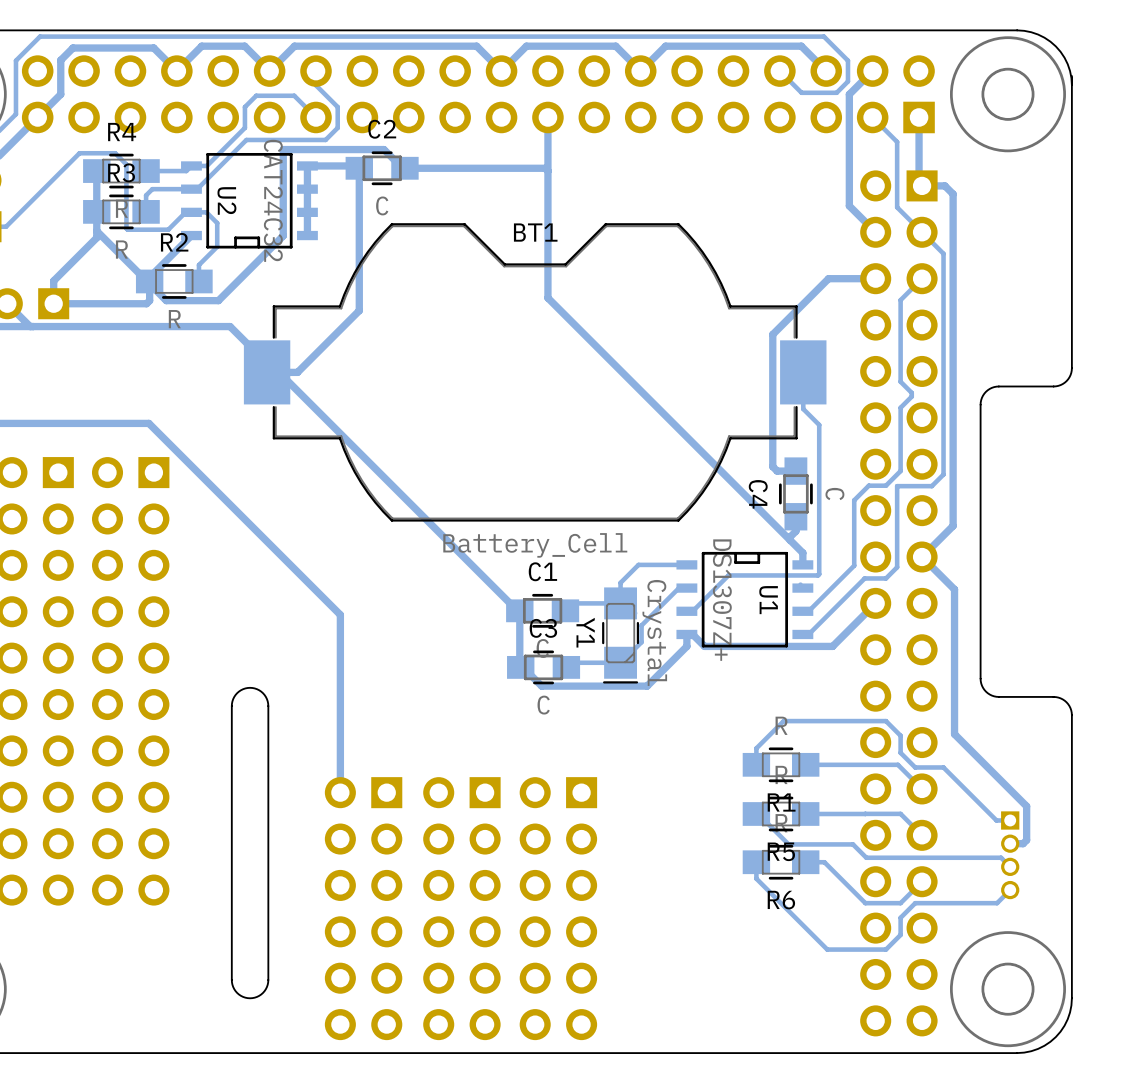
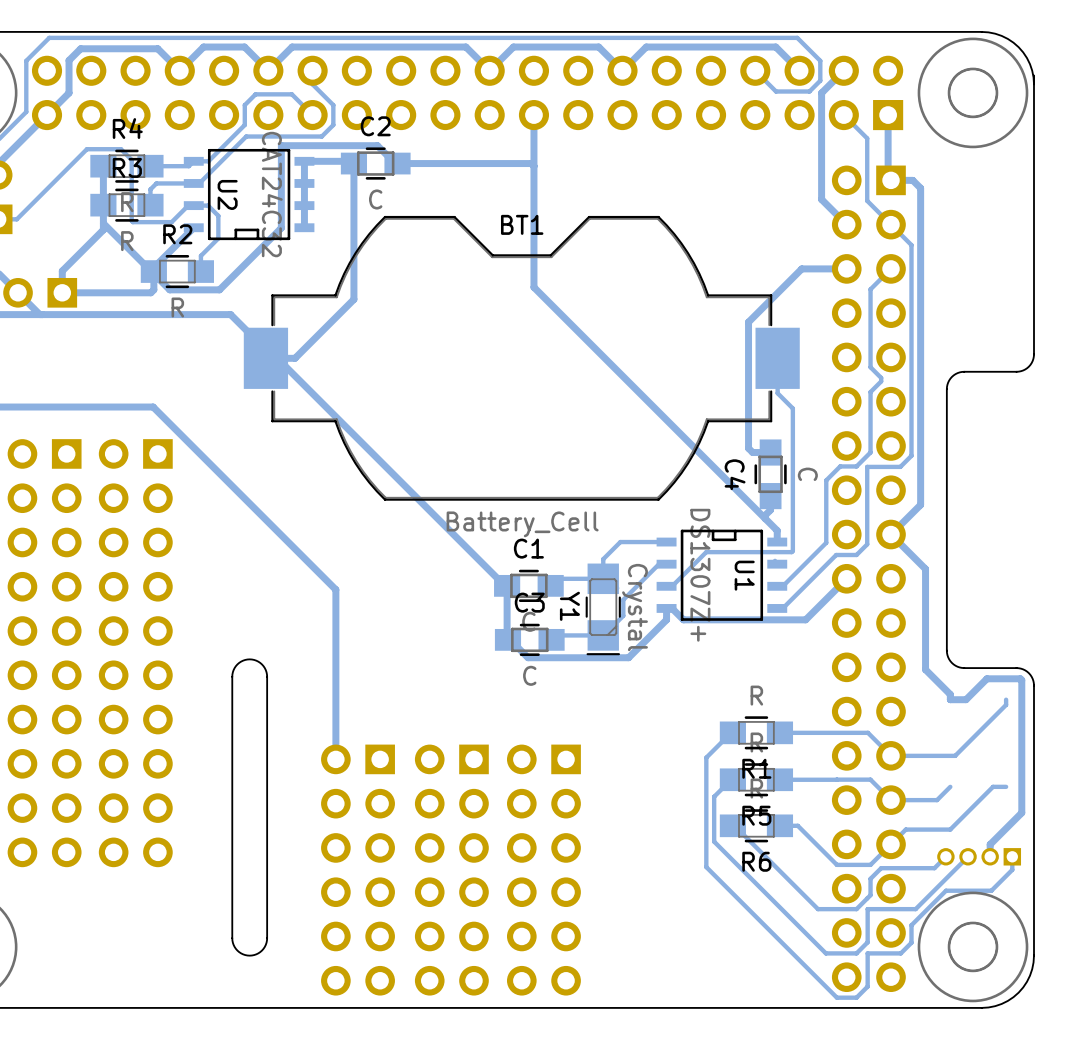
track: (954, 589) (954, 734) (1026, 806) (1026, 840) (1023, 843) (1010, 843) -> (922, 565) (925, 569) (925, 669) (950, 694) (950, 699) (966, 699) (986, 678) (1021, 680) (1021, 812) (990, 844) (990, 856)
track: none -> (1006, 699) (1006, 704) (955, 755) (891, 755)
track: (756, 764) (756, 748) (783, 721) (885, 721) (900, 735) (900, 752) (915, 767) (943, 767) (996, 820) (1010, 820) -> (732, 732) (706, 757) (706, 867) (836, 997) (856, 997) (867, 986) (867, 953) (900, 953) (911, 942) (911, 925) (946, 890) (991, 890) (1012, 869) (1012, 856)
track: none -> (732, 779) (714, 796) (714, 841) (825, 953) (856, 953) (867, 942) (867, 909) (915, 909) (968, 856)
track: (758, 813) (788, 844) (853, 844) (866, 857) (1001, 857) (1010, 866) -> none
track: none -> (950, 786) (937, 800) (891, 800)
track: none -> (1006, 786) (993, 786) (950, 829) (905, 829) (891, 844)
part rotation: 0° (1010, 855) -> 90° clockwise (979, 856)
track: (756, 862) (756, 878) (827, 949) (845, 949) -> (732, 825) (817, 909)
track: (1010, 890) (997, 903) (915, 903) (911, 906) -> (945, 856) (934, 868) (881, 868)

